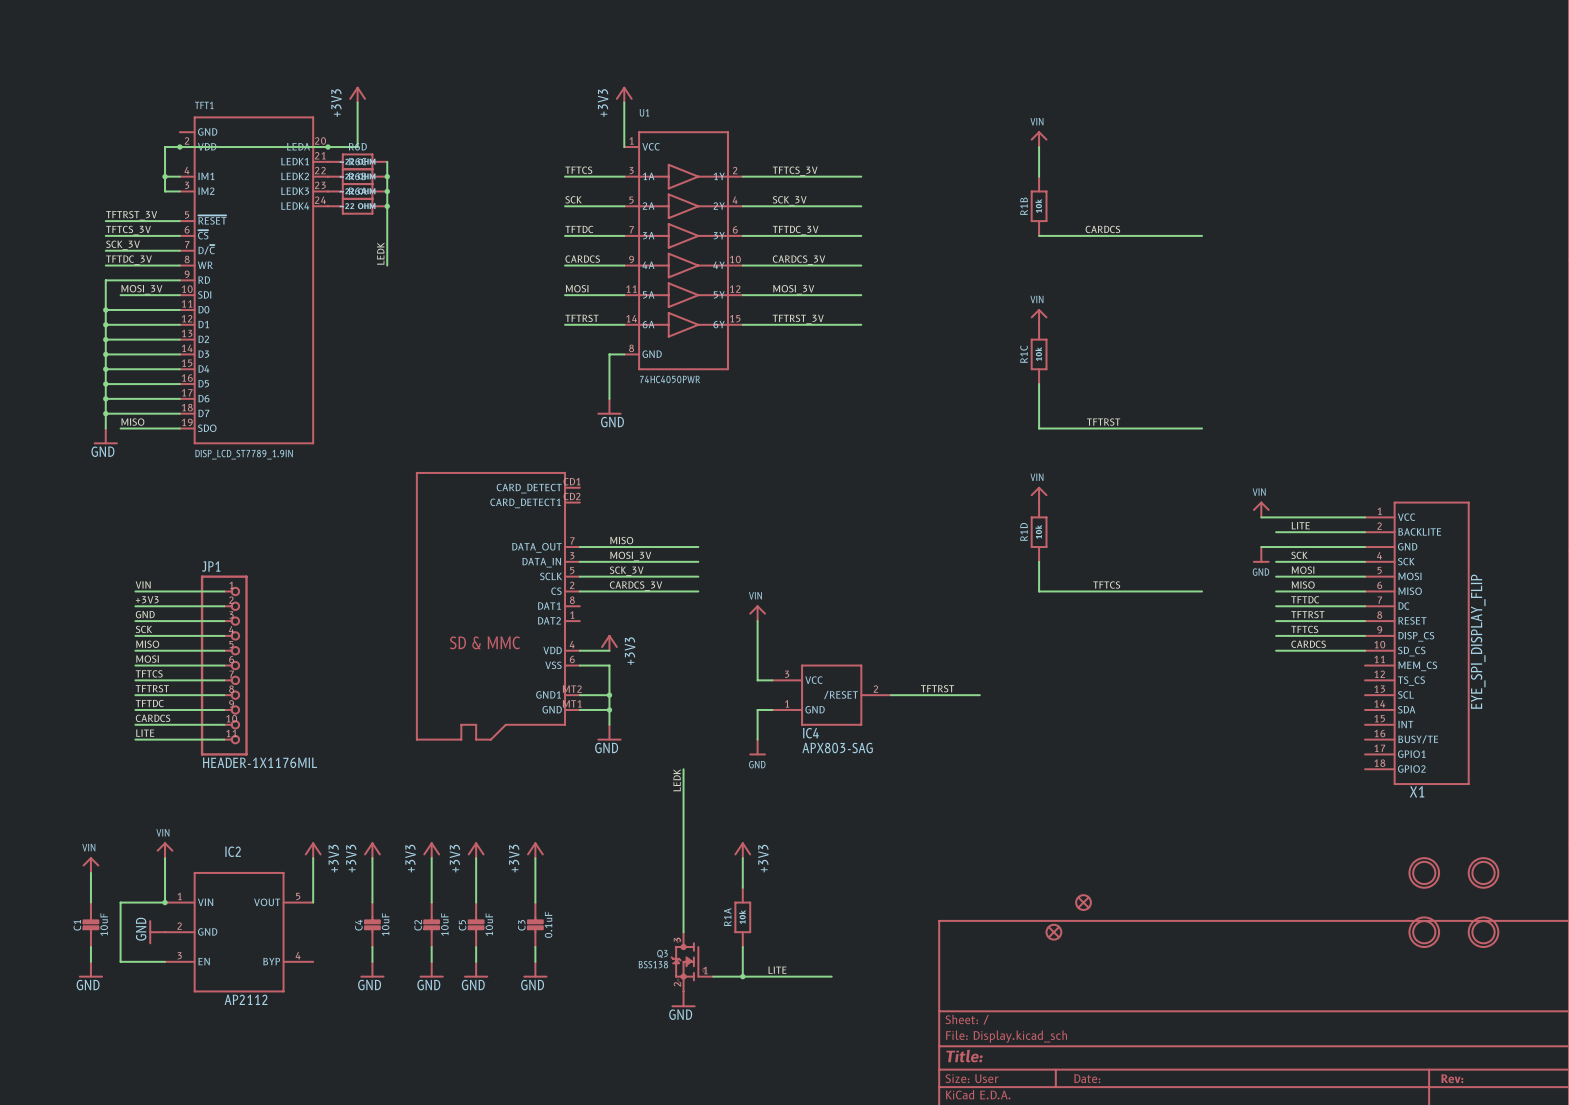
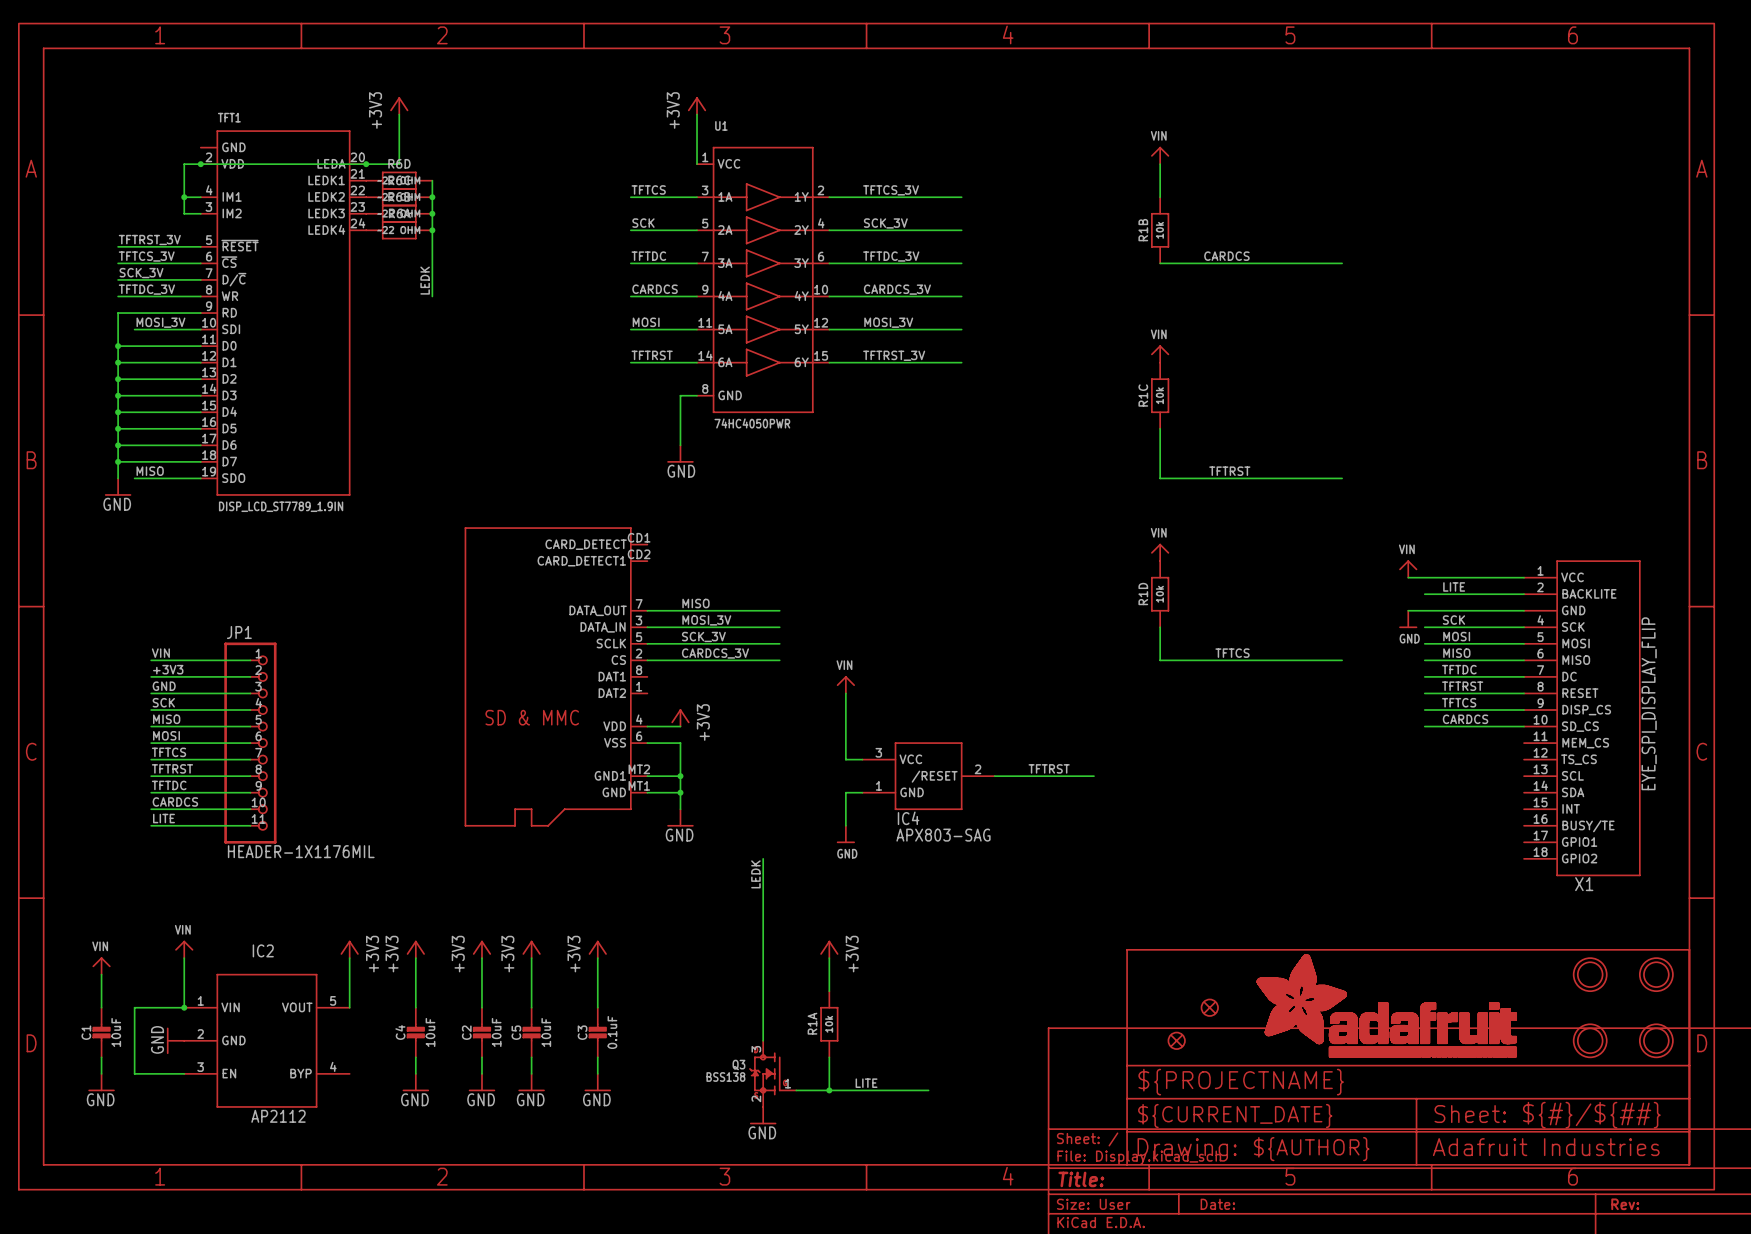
drawing: none -> [18, 23, 1715, 1190]

